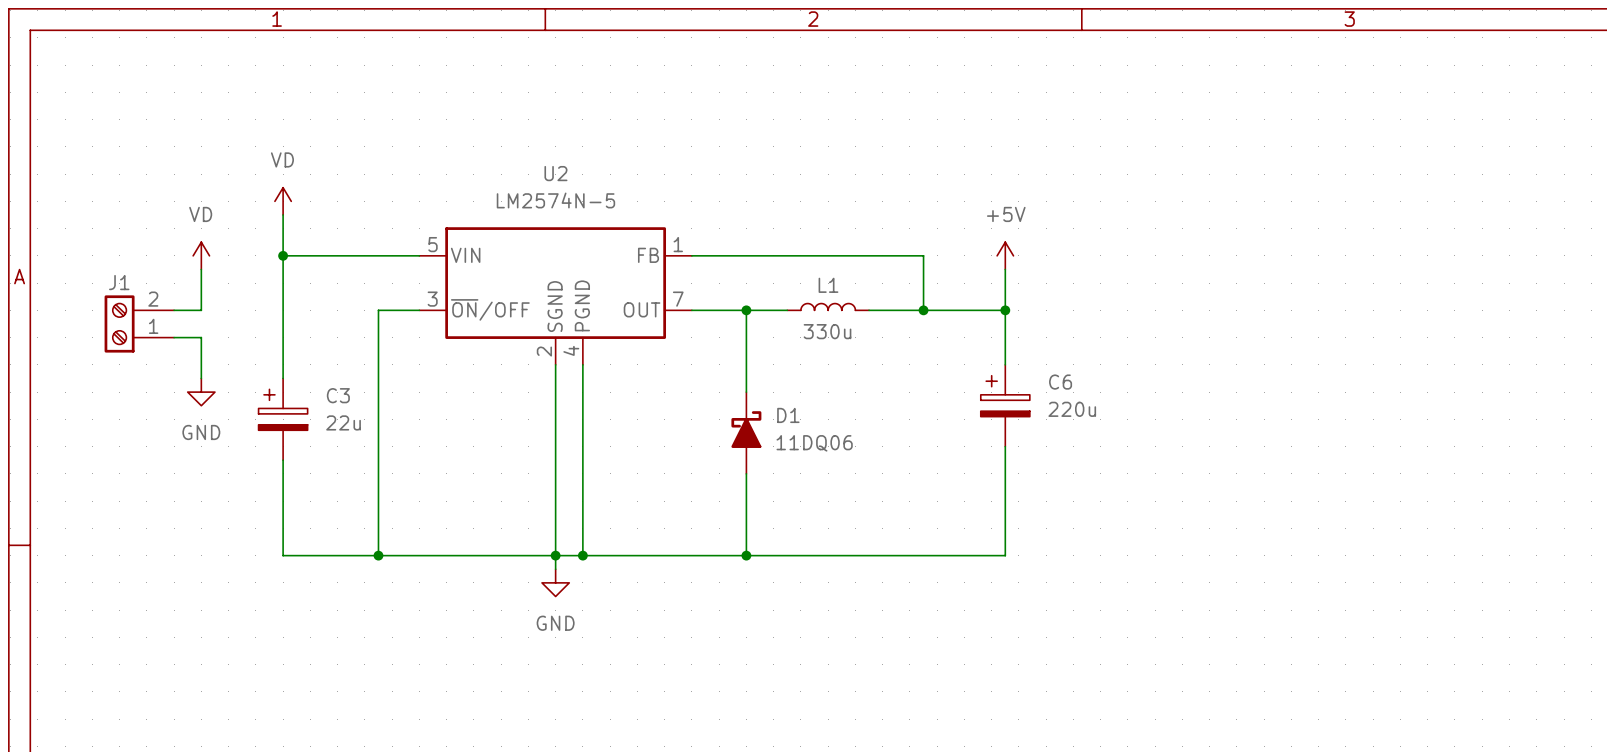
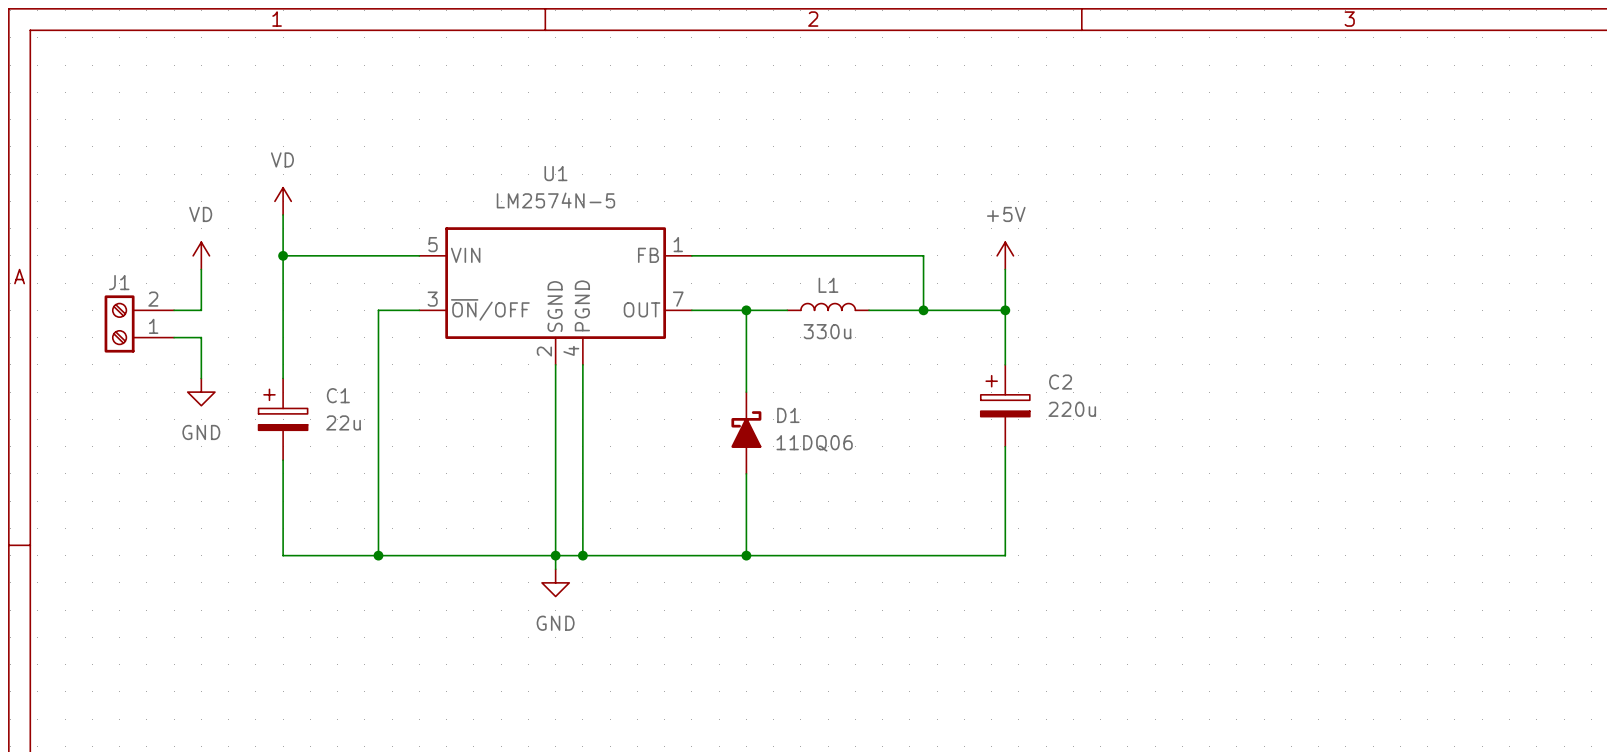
U2 name: U2 (555, 173) -> U1 (555, 173)
C6 name: C6 (1060, 382) -> C2 (1060, 382)
C3 name: C3 (338, 395) -> C1 (338, 395)

